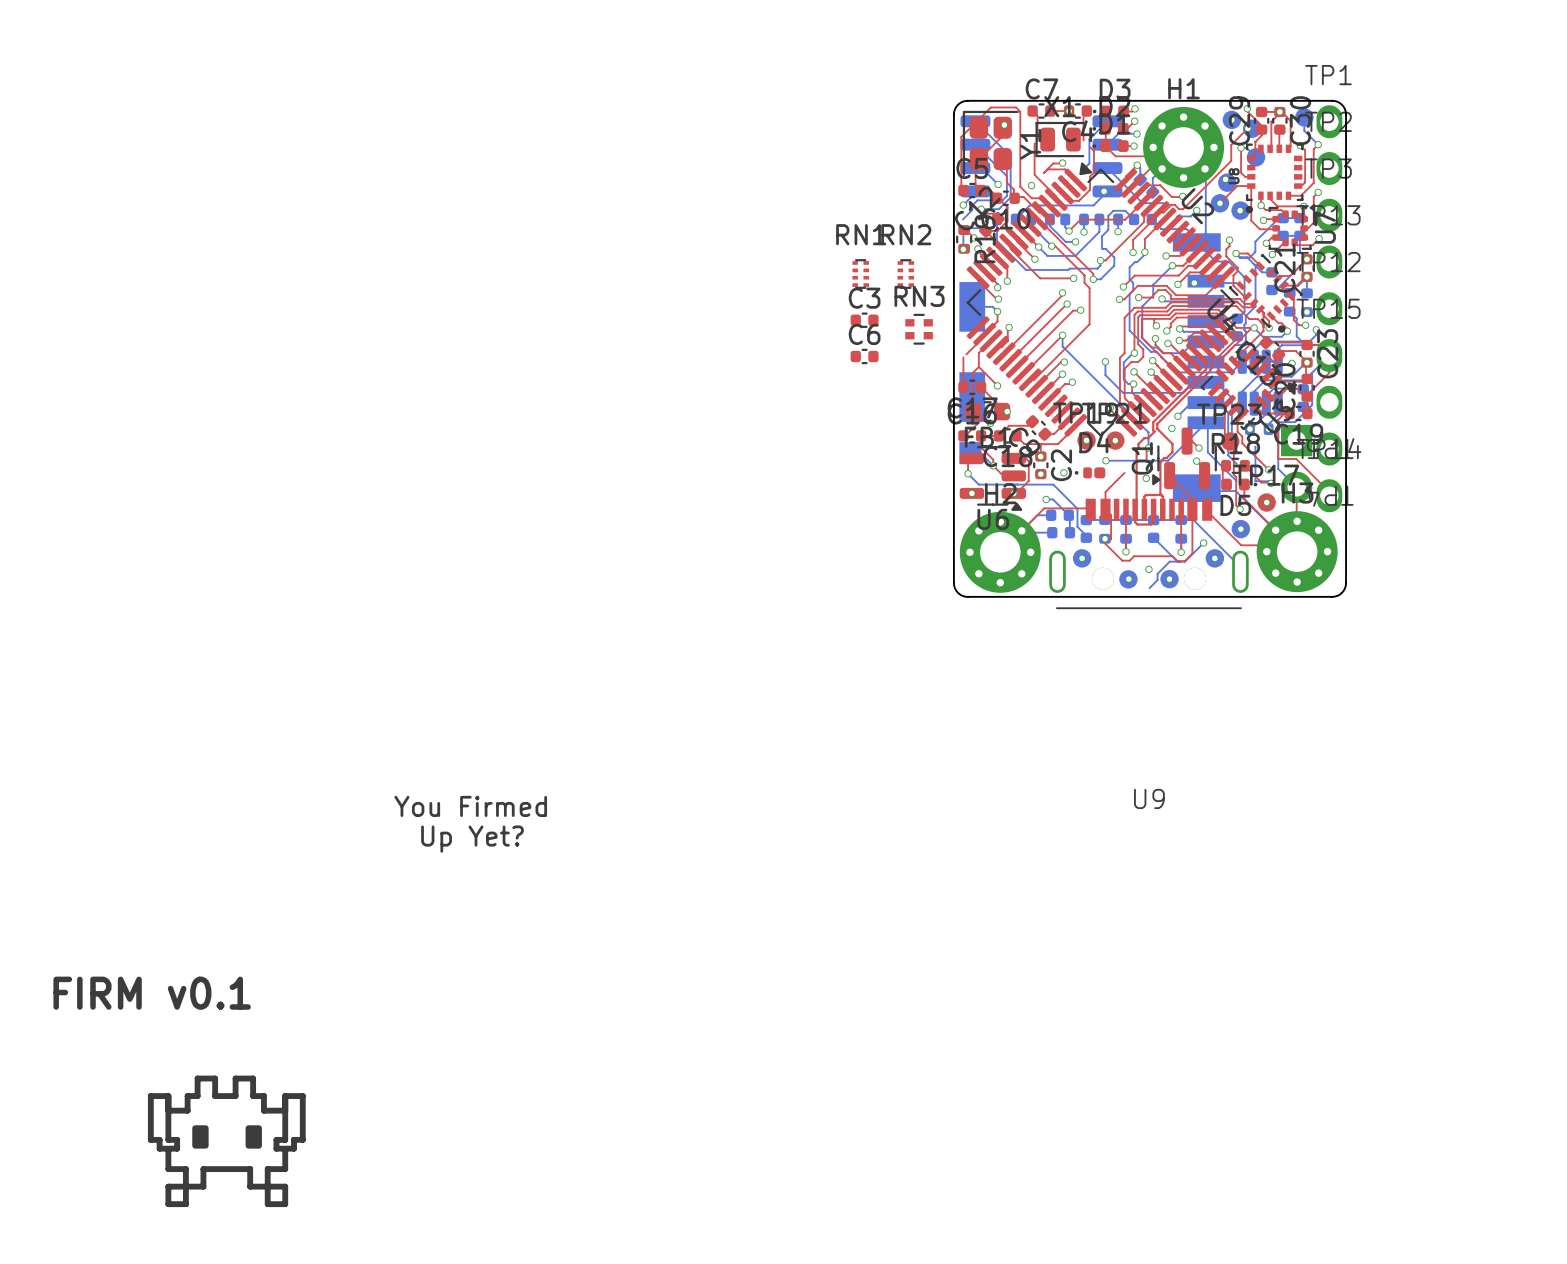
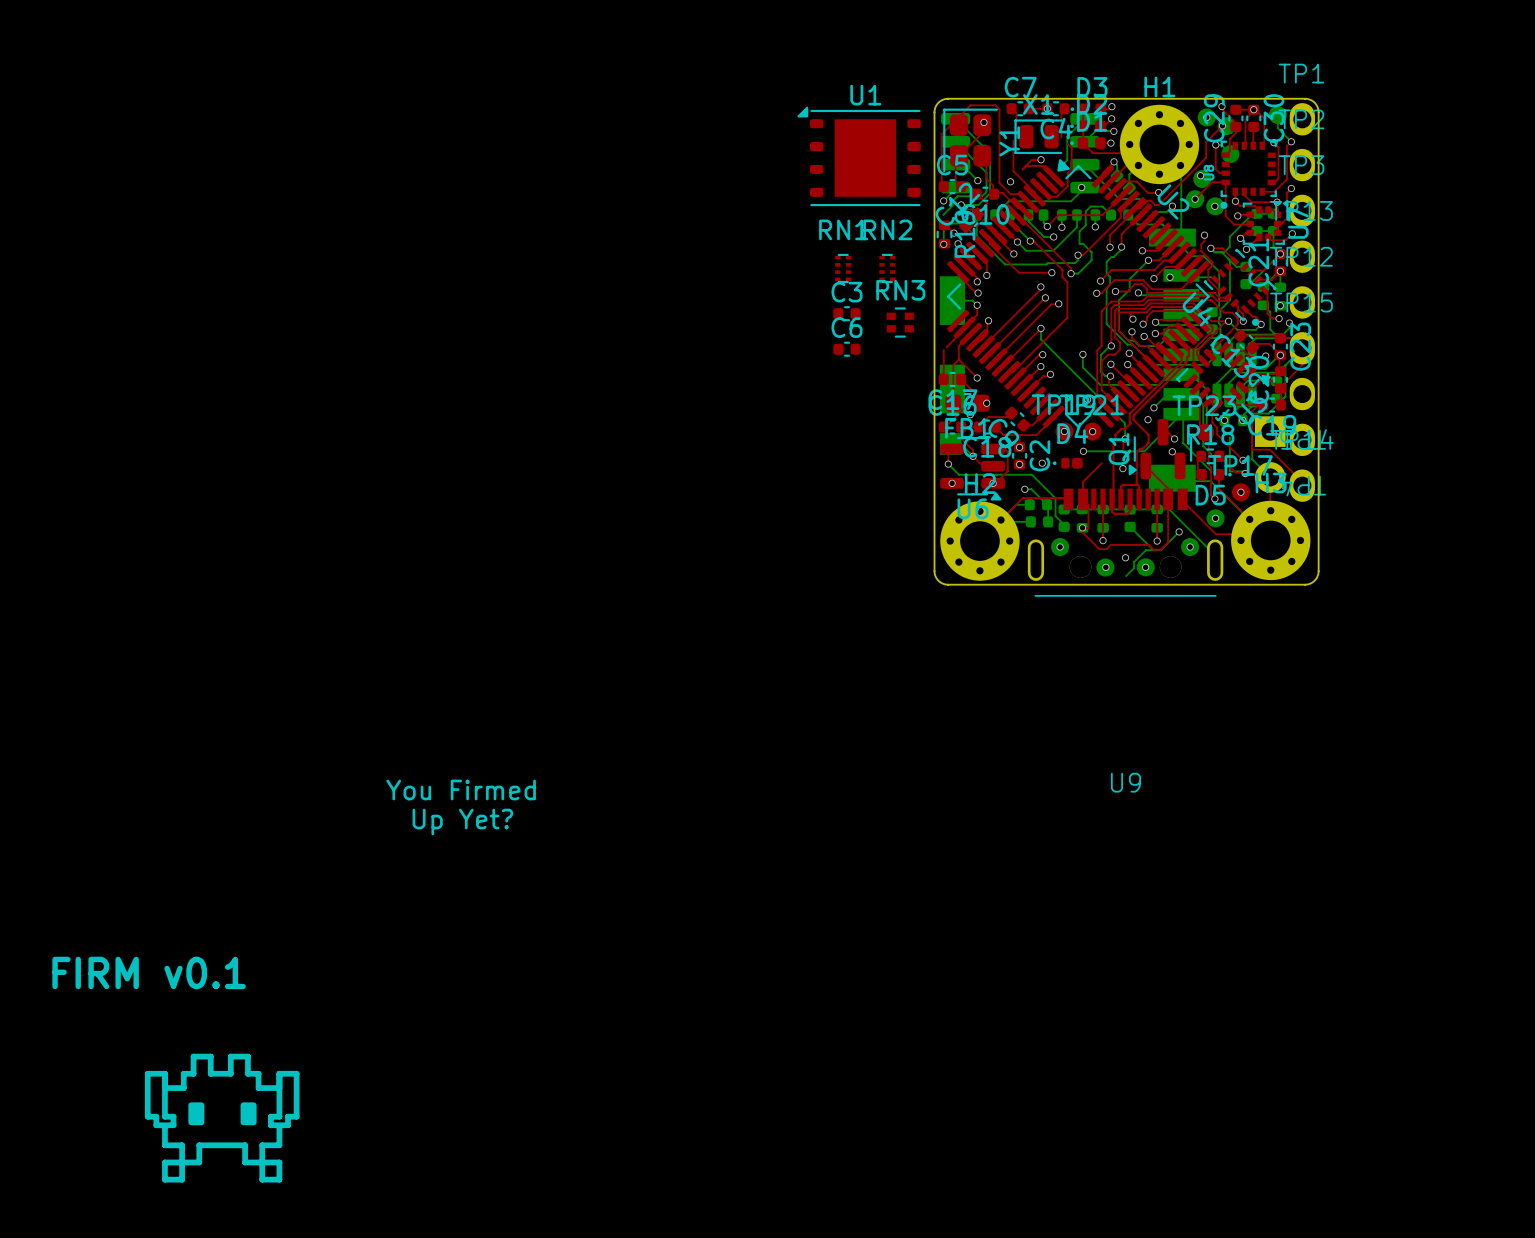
U1: none -> (859, 156)

